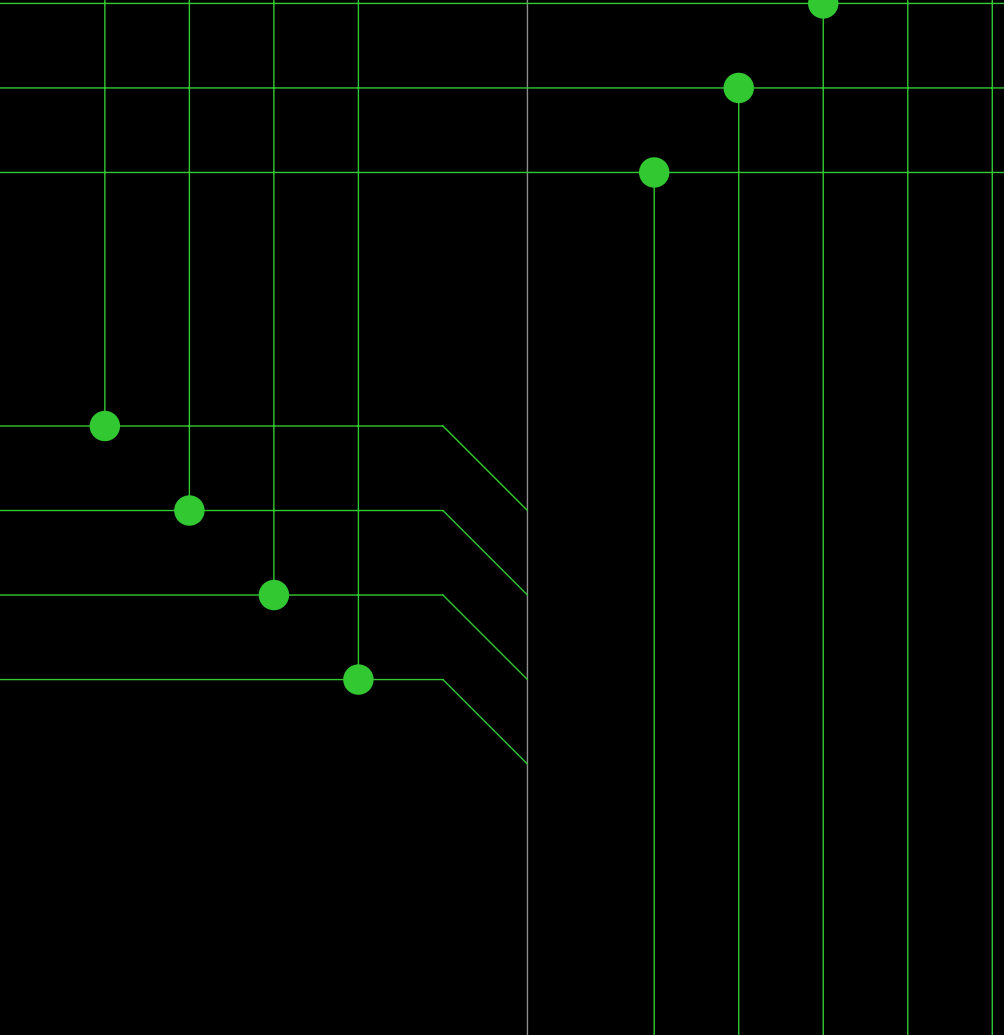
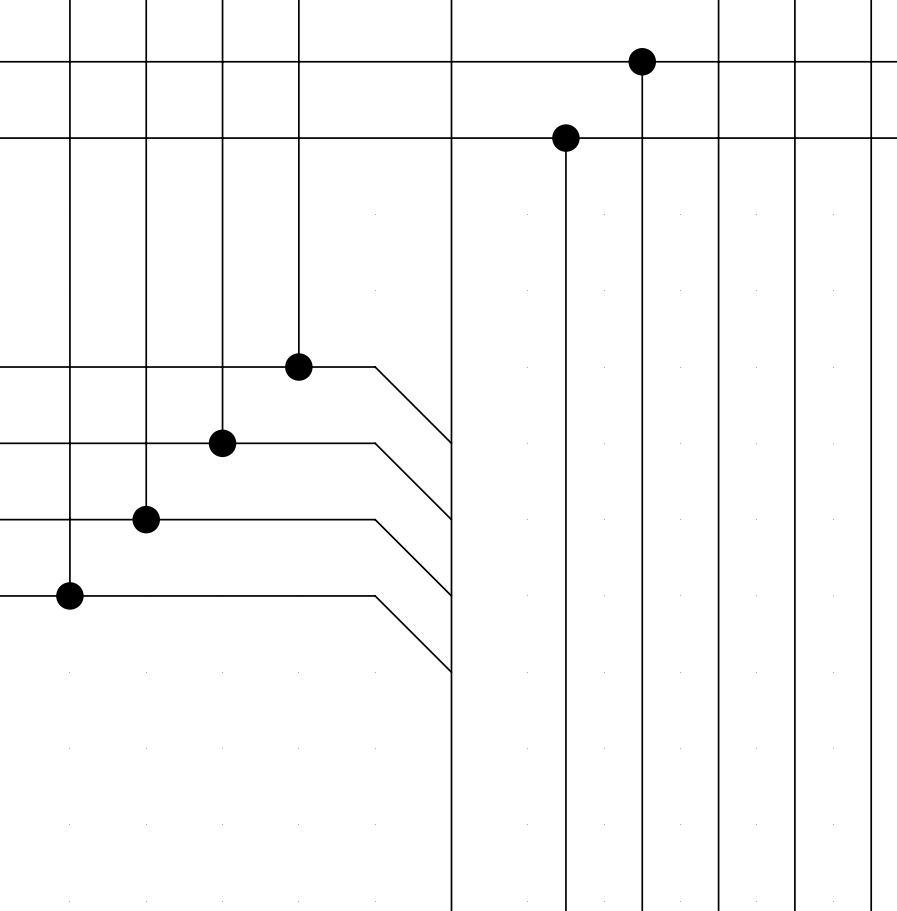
junction: (104, 426) -> none
wire: (358, 426) (358, 679) -> (69, 367) (69, 595)
junction: none -> (298, 367)
junction: (189, 510) -> none
wire: (273, 510) (273, 595) -> (146, 443) (146, 519)
junction: none -> (222, 443)
junction: none -> (146, 519)
junction: (273, 595) -> none
junction: none -> (69, 595)
junction: (358, 679) -> none

